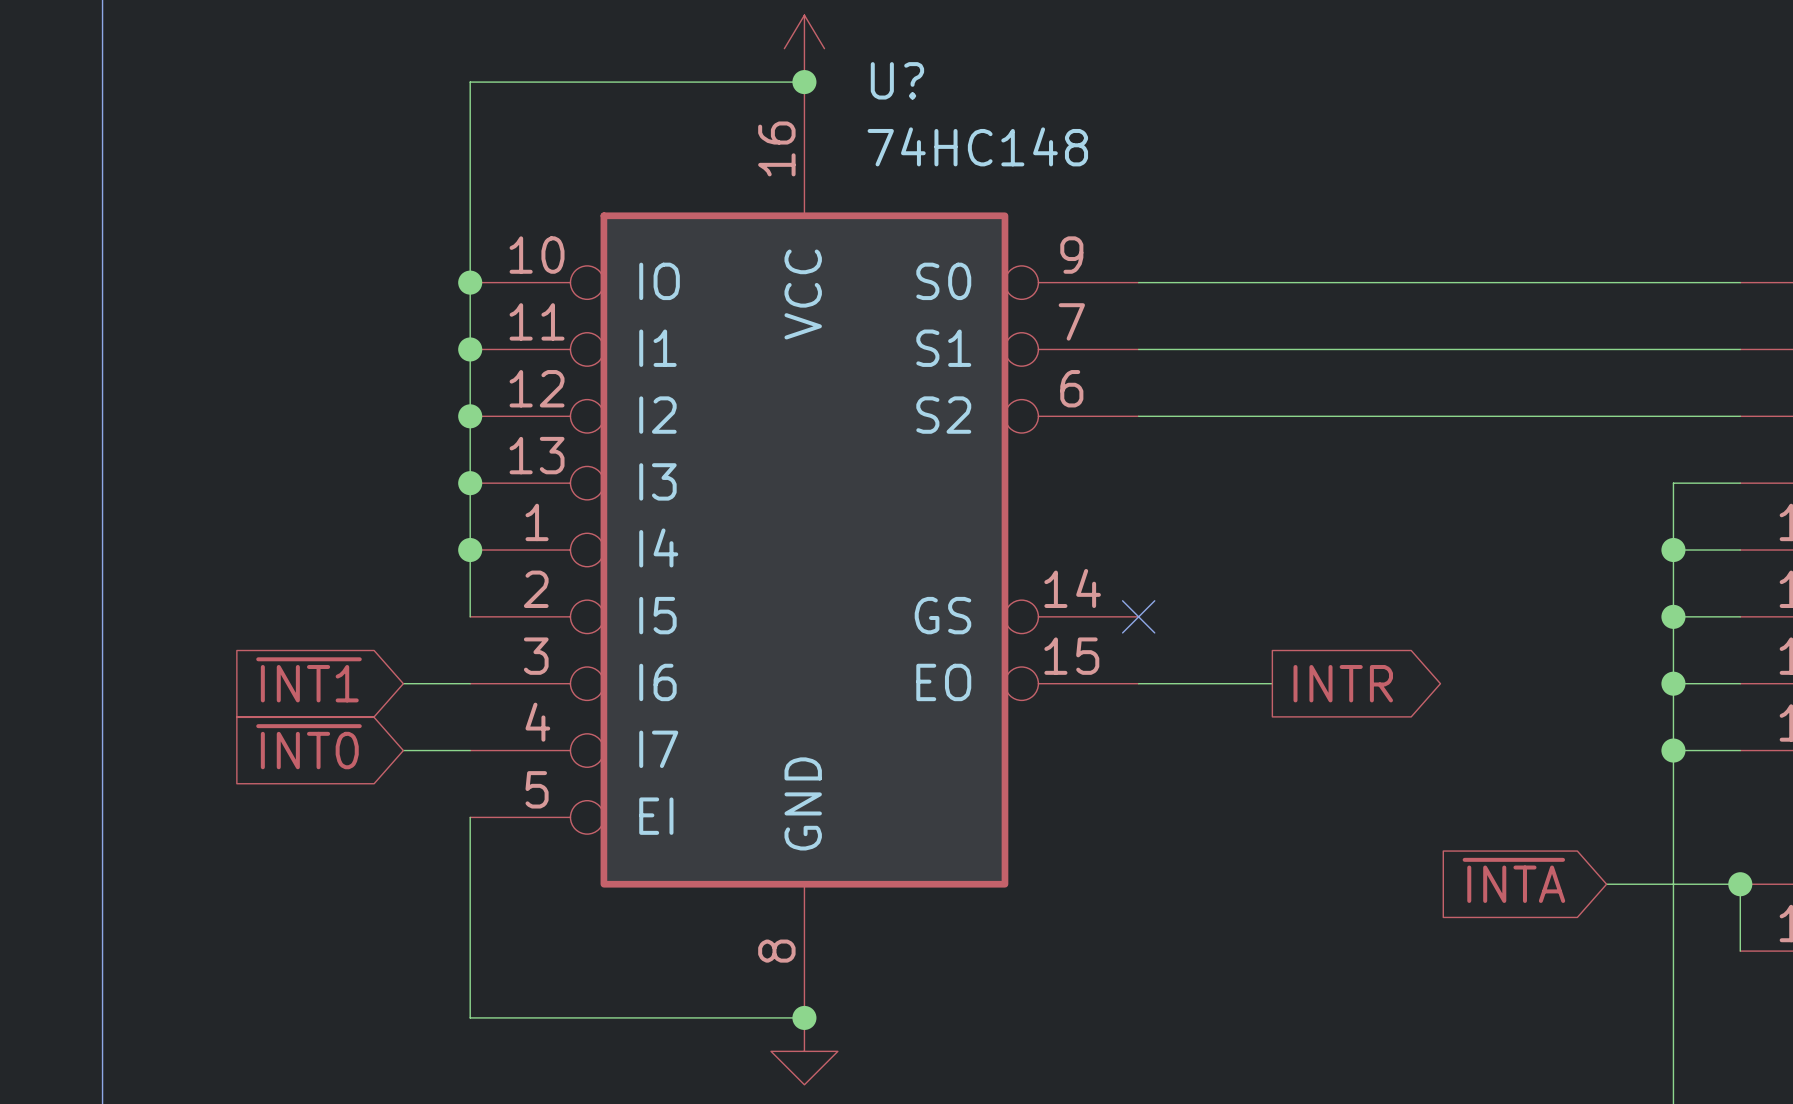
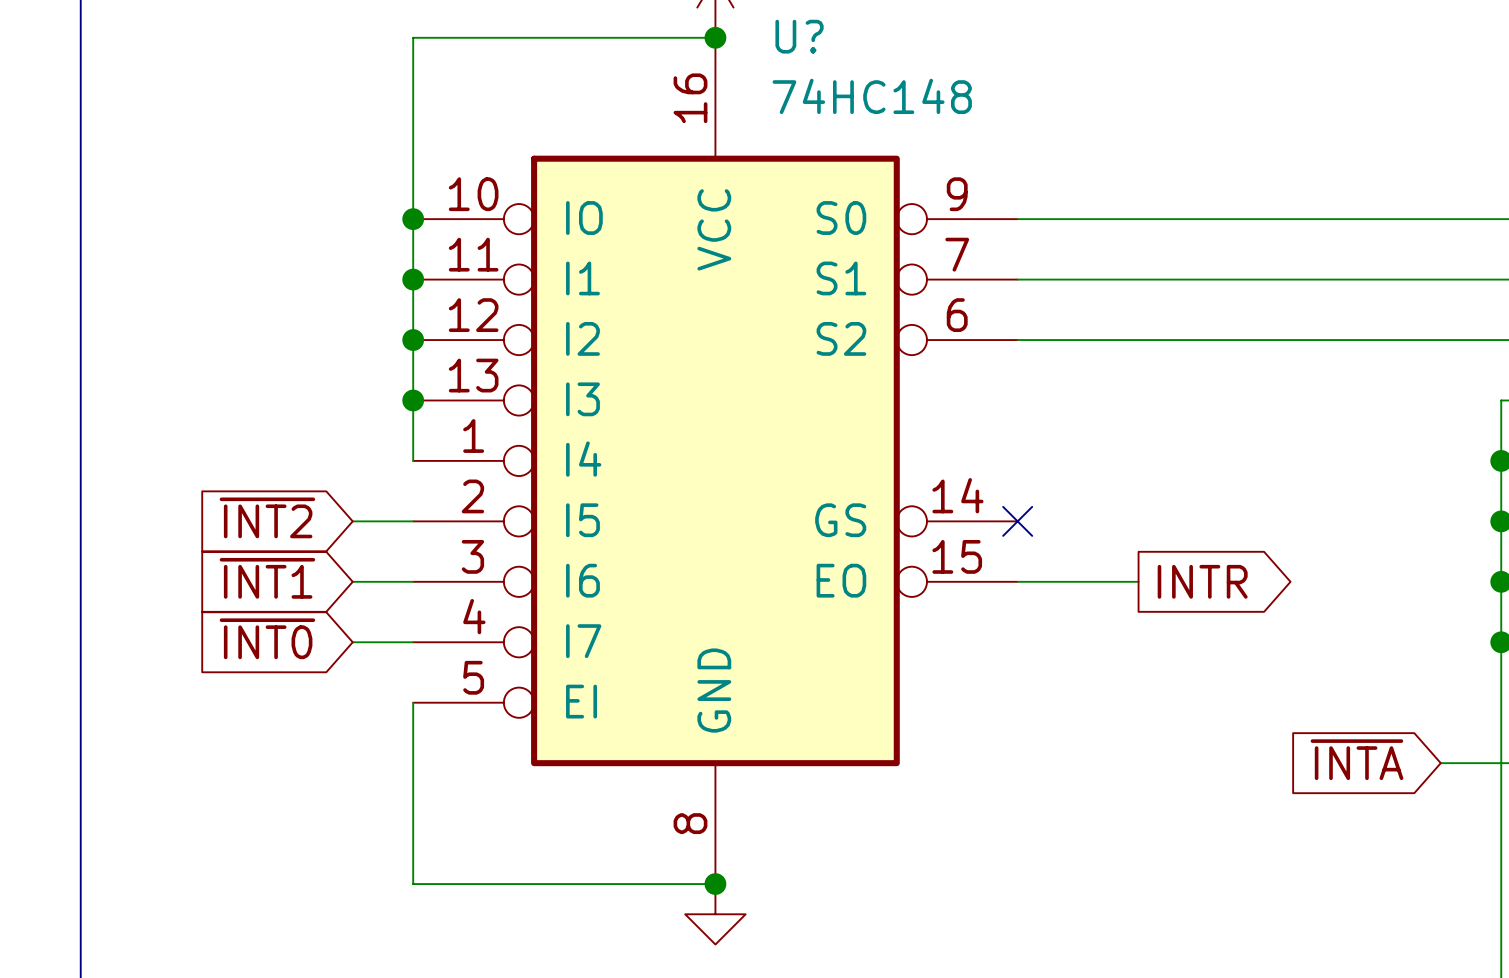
wire: (470, 550) (470, 616) -> (352, 521) (413, 521)
junction: (470, 550) -> none
global label: none -> ~{INT2} (267, 517)

